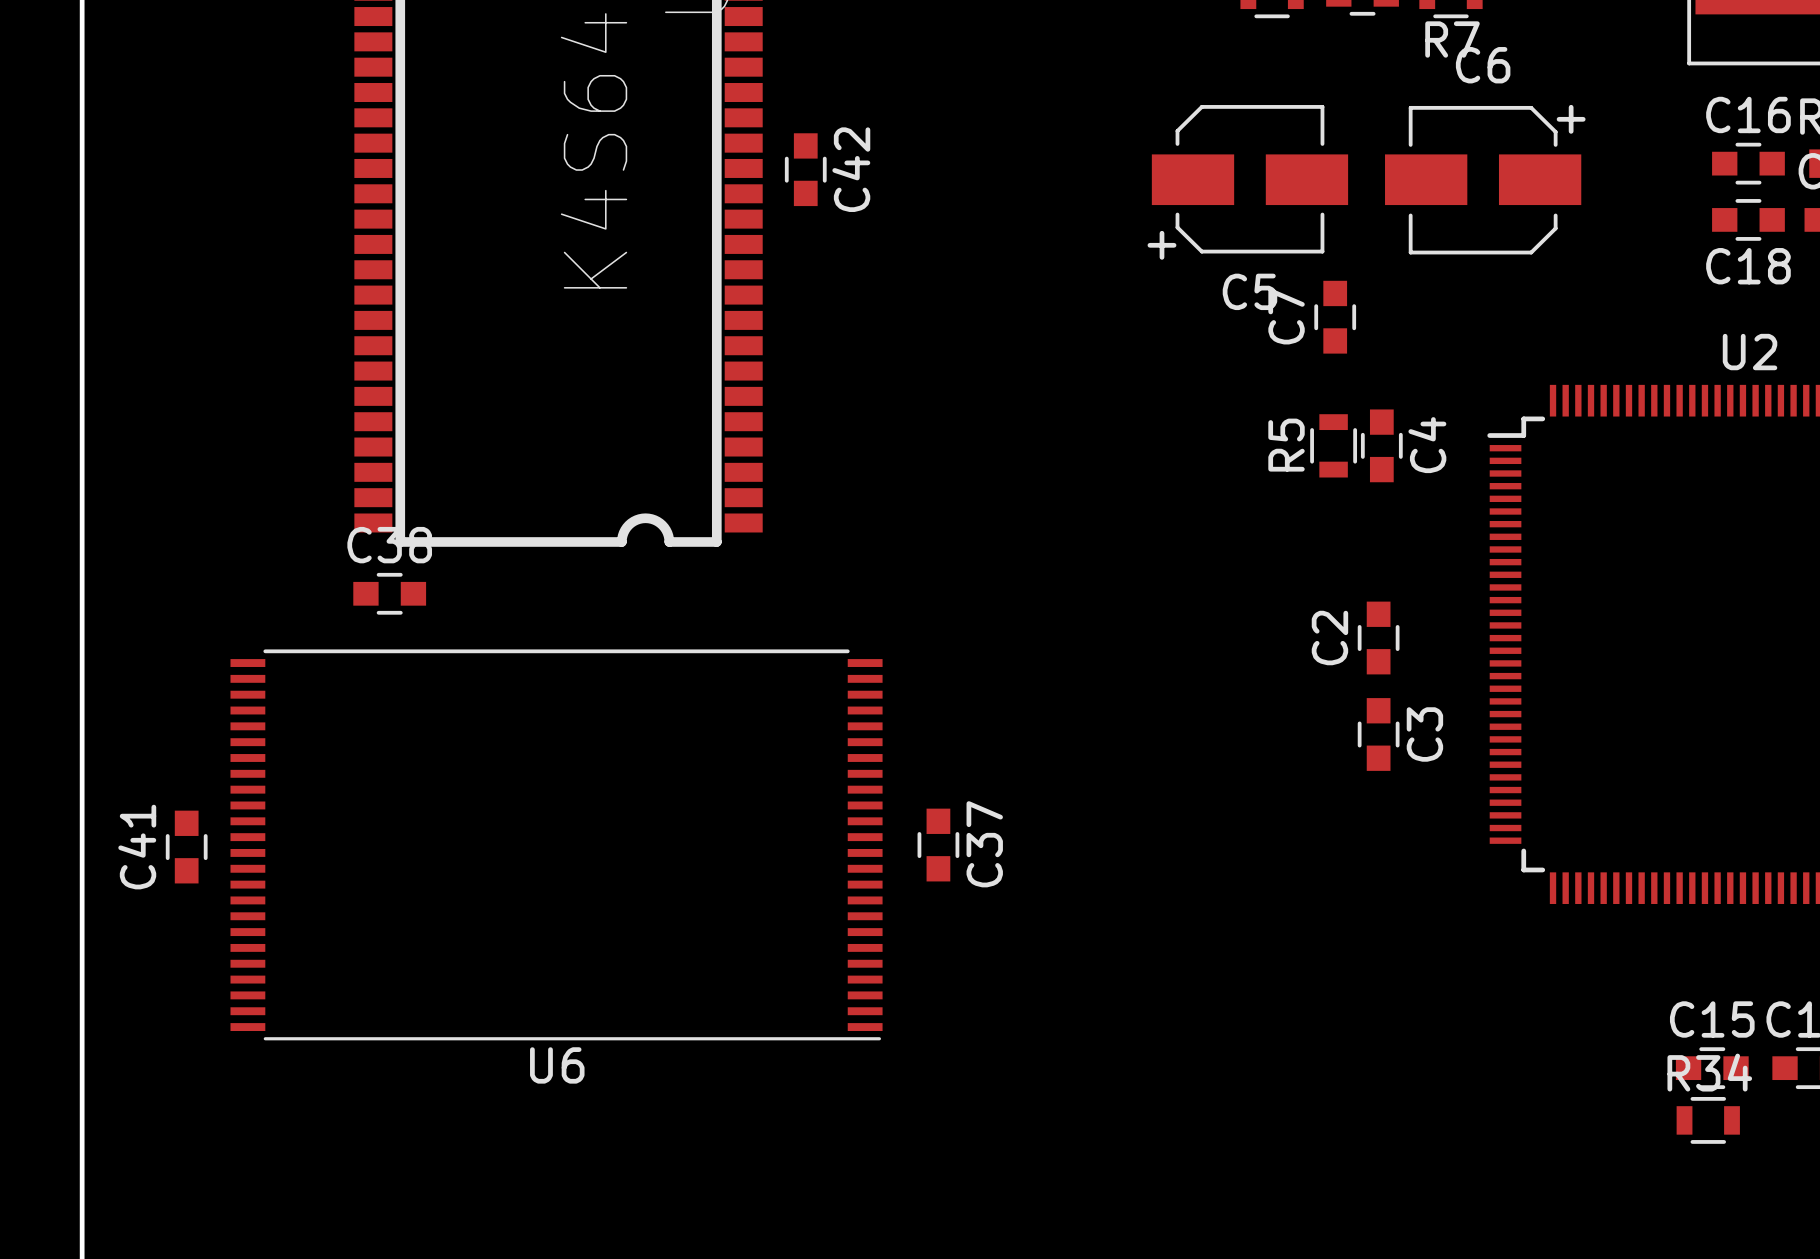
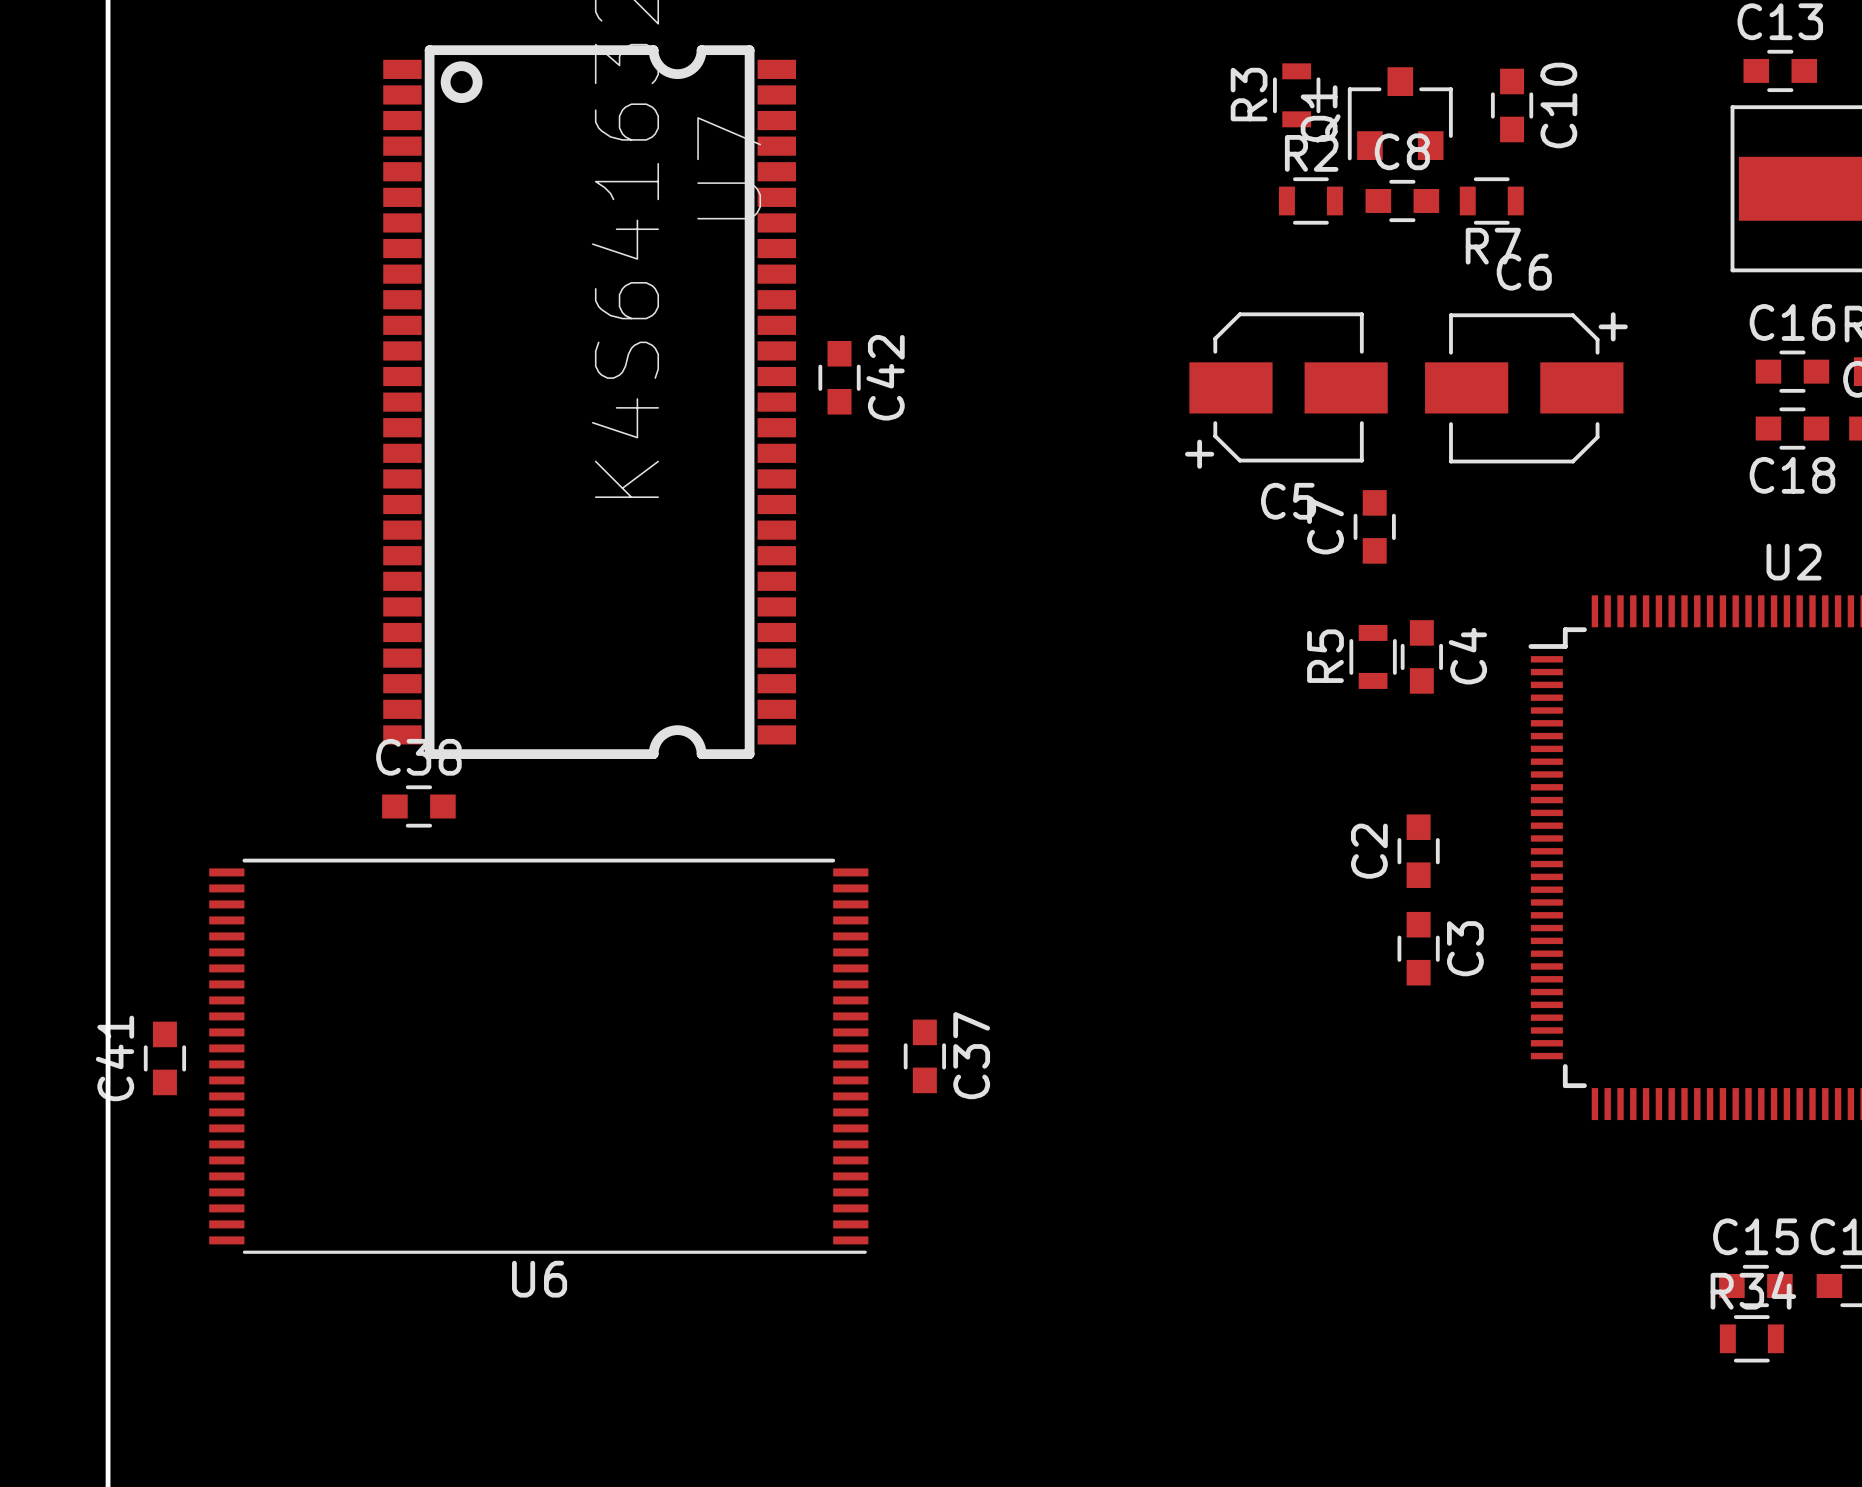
U6 position: (556, 844) -> (538, 1056)
C37 position: (938, 845) -> (924, 1056)
C41 position: (186, 847) -> (164, 1058)

